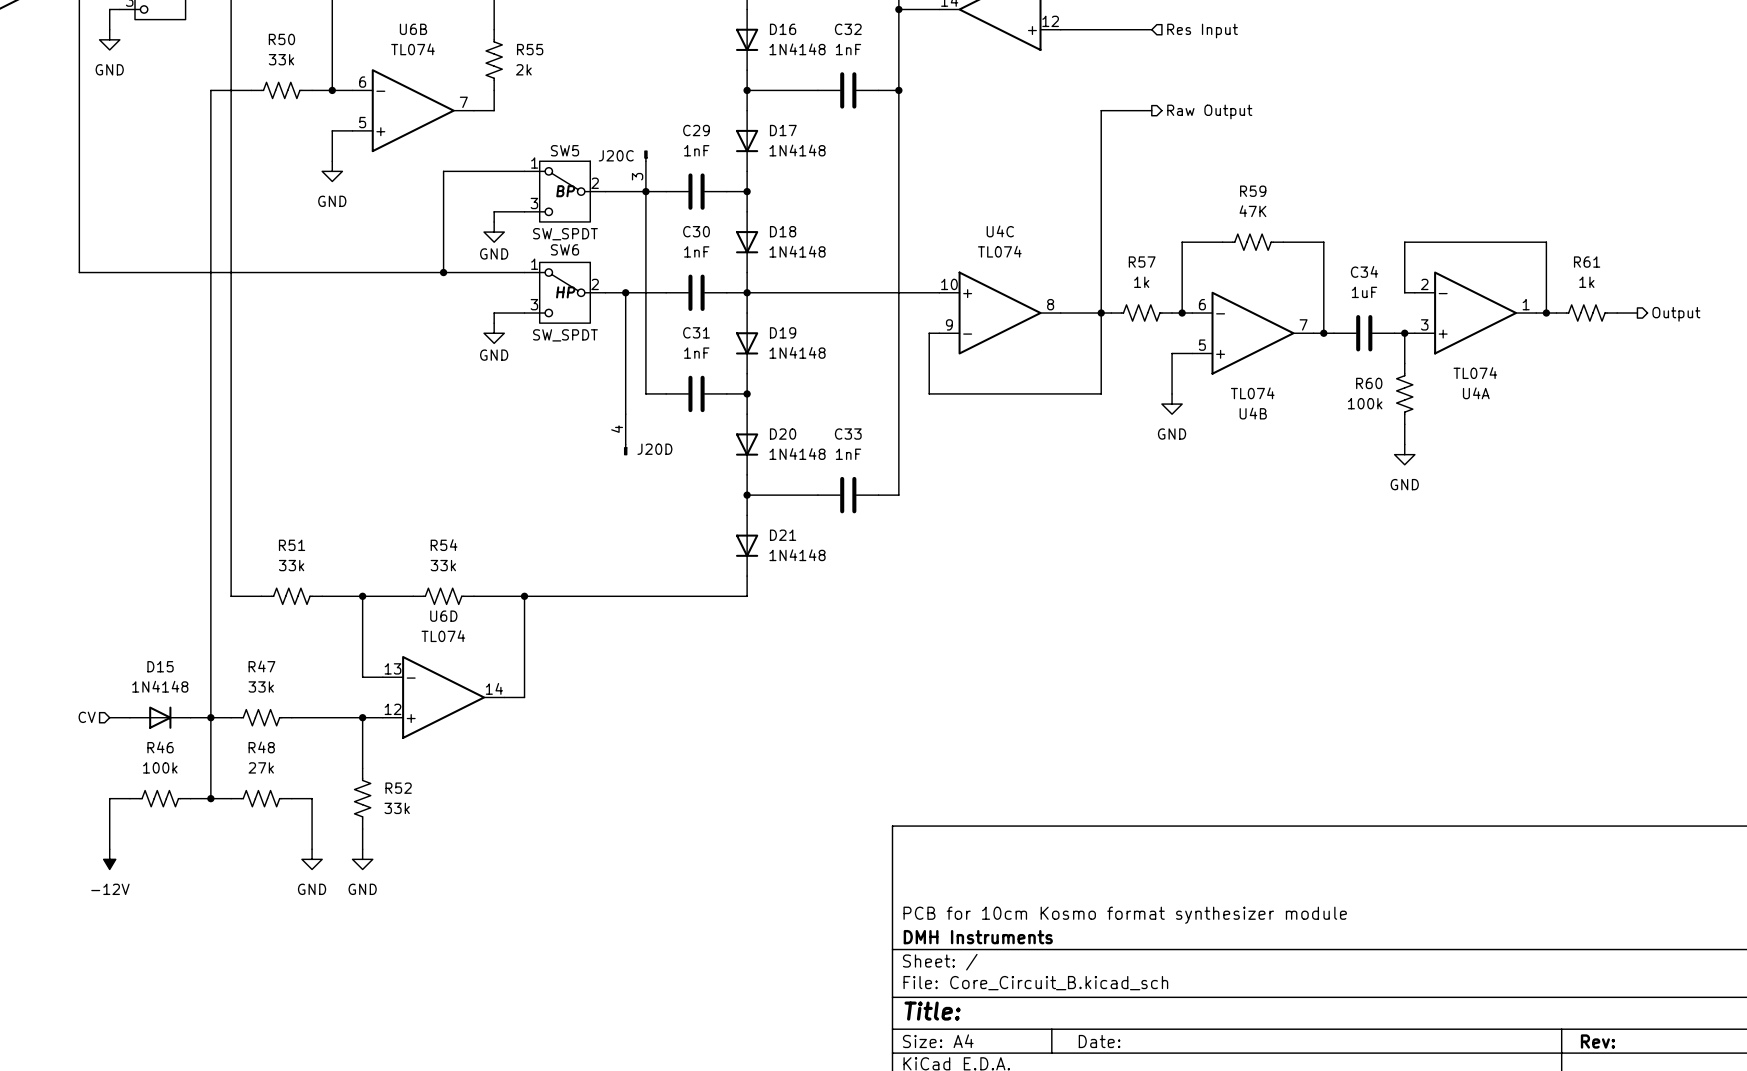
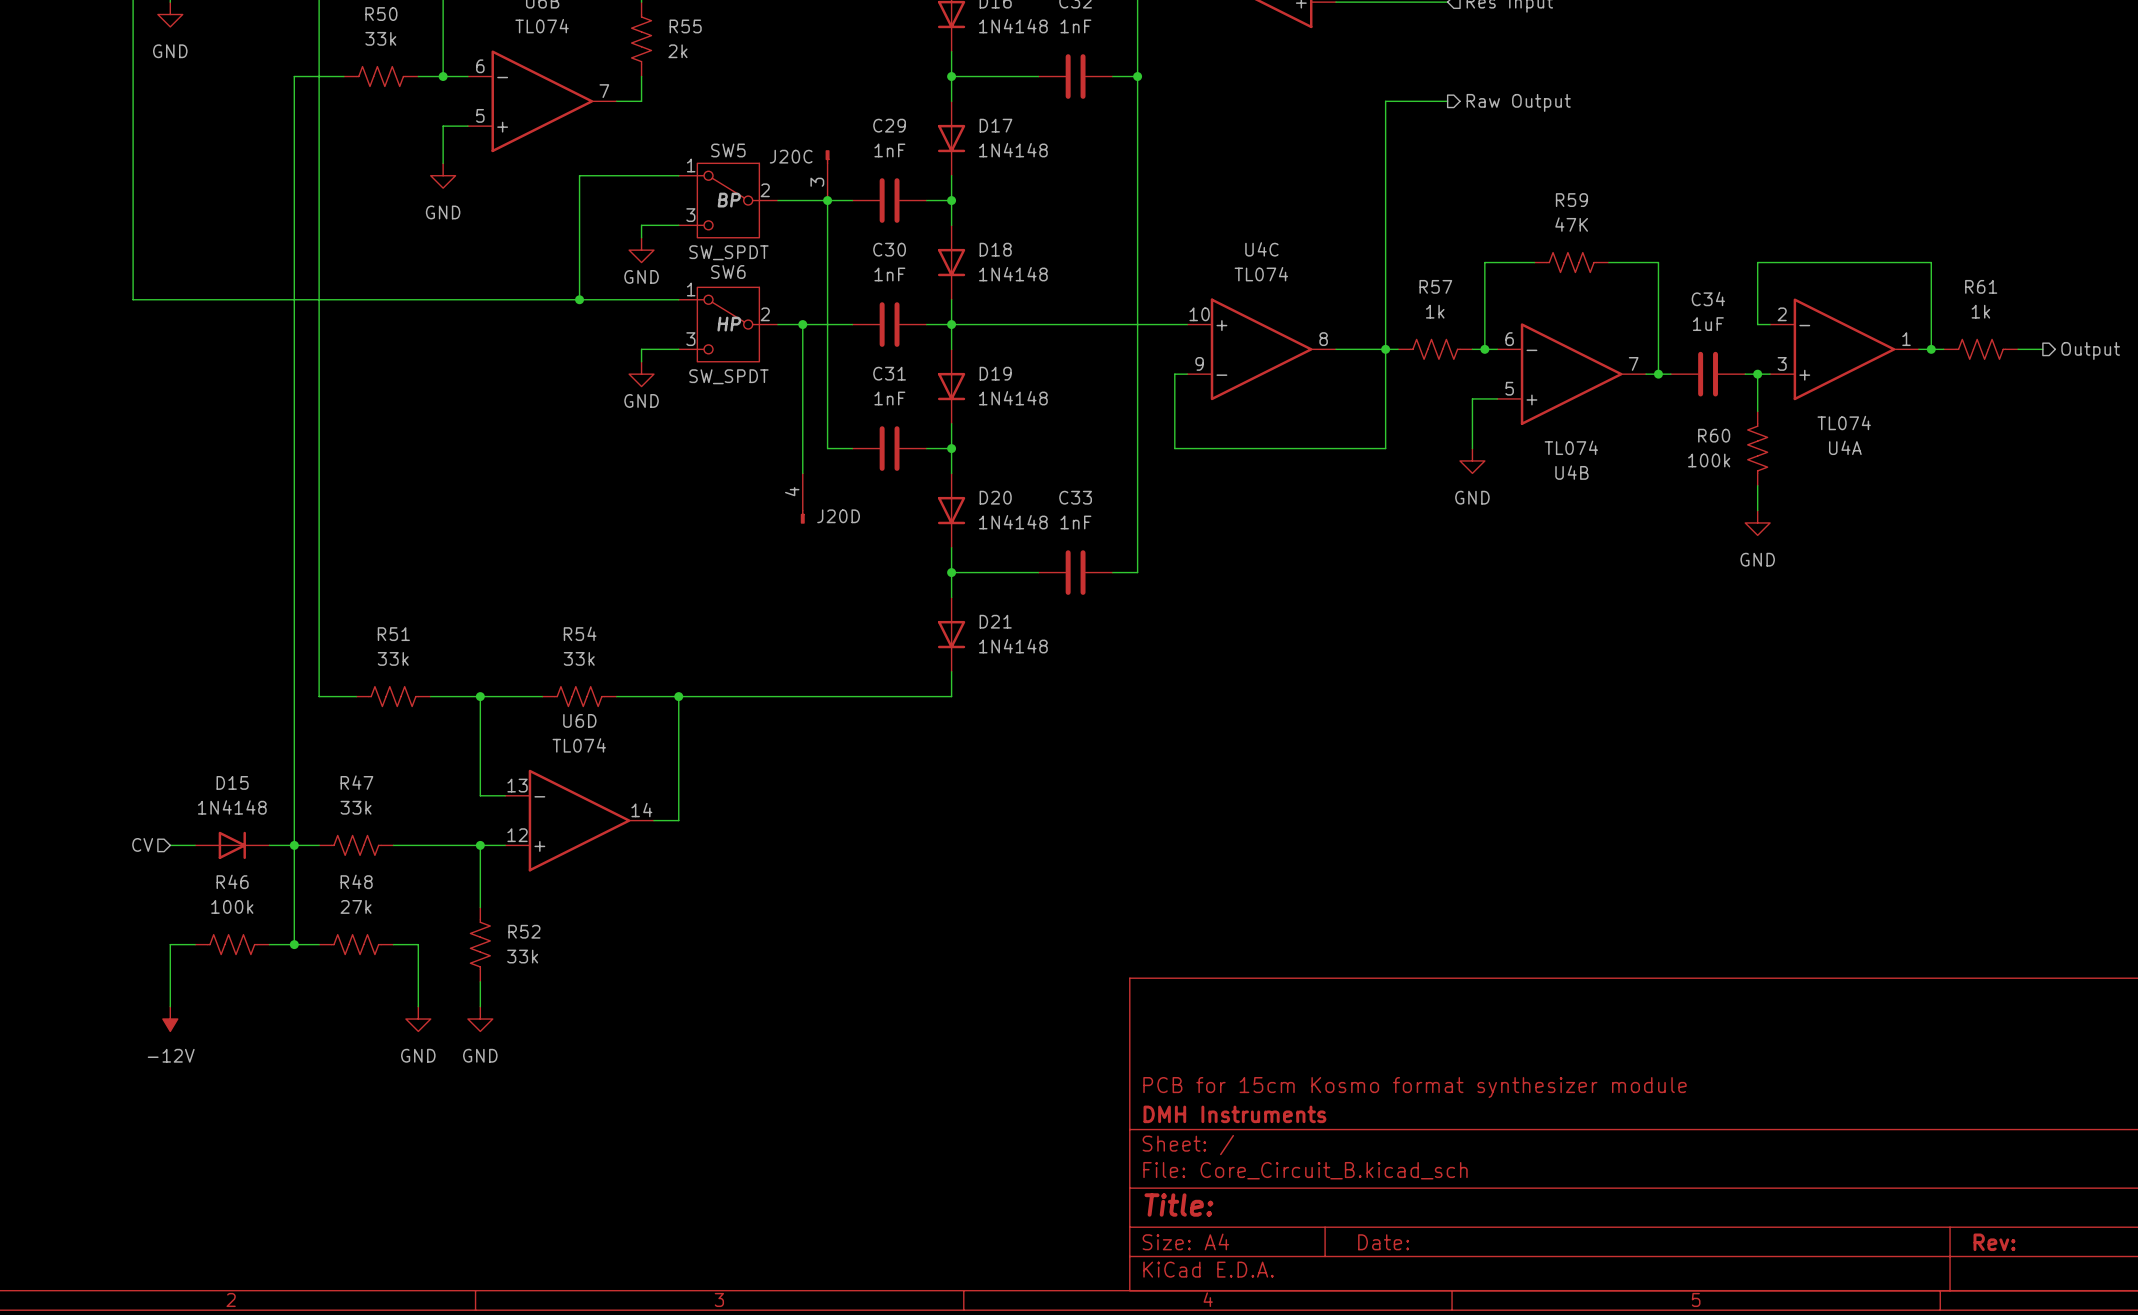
title block: PCB for 10cm Kosmo format synthesizer module (1125, 915) -> PCB for 15cm Kosmo format synthesizer module (1415, 1087)

